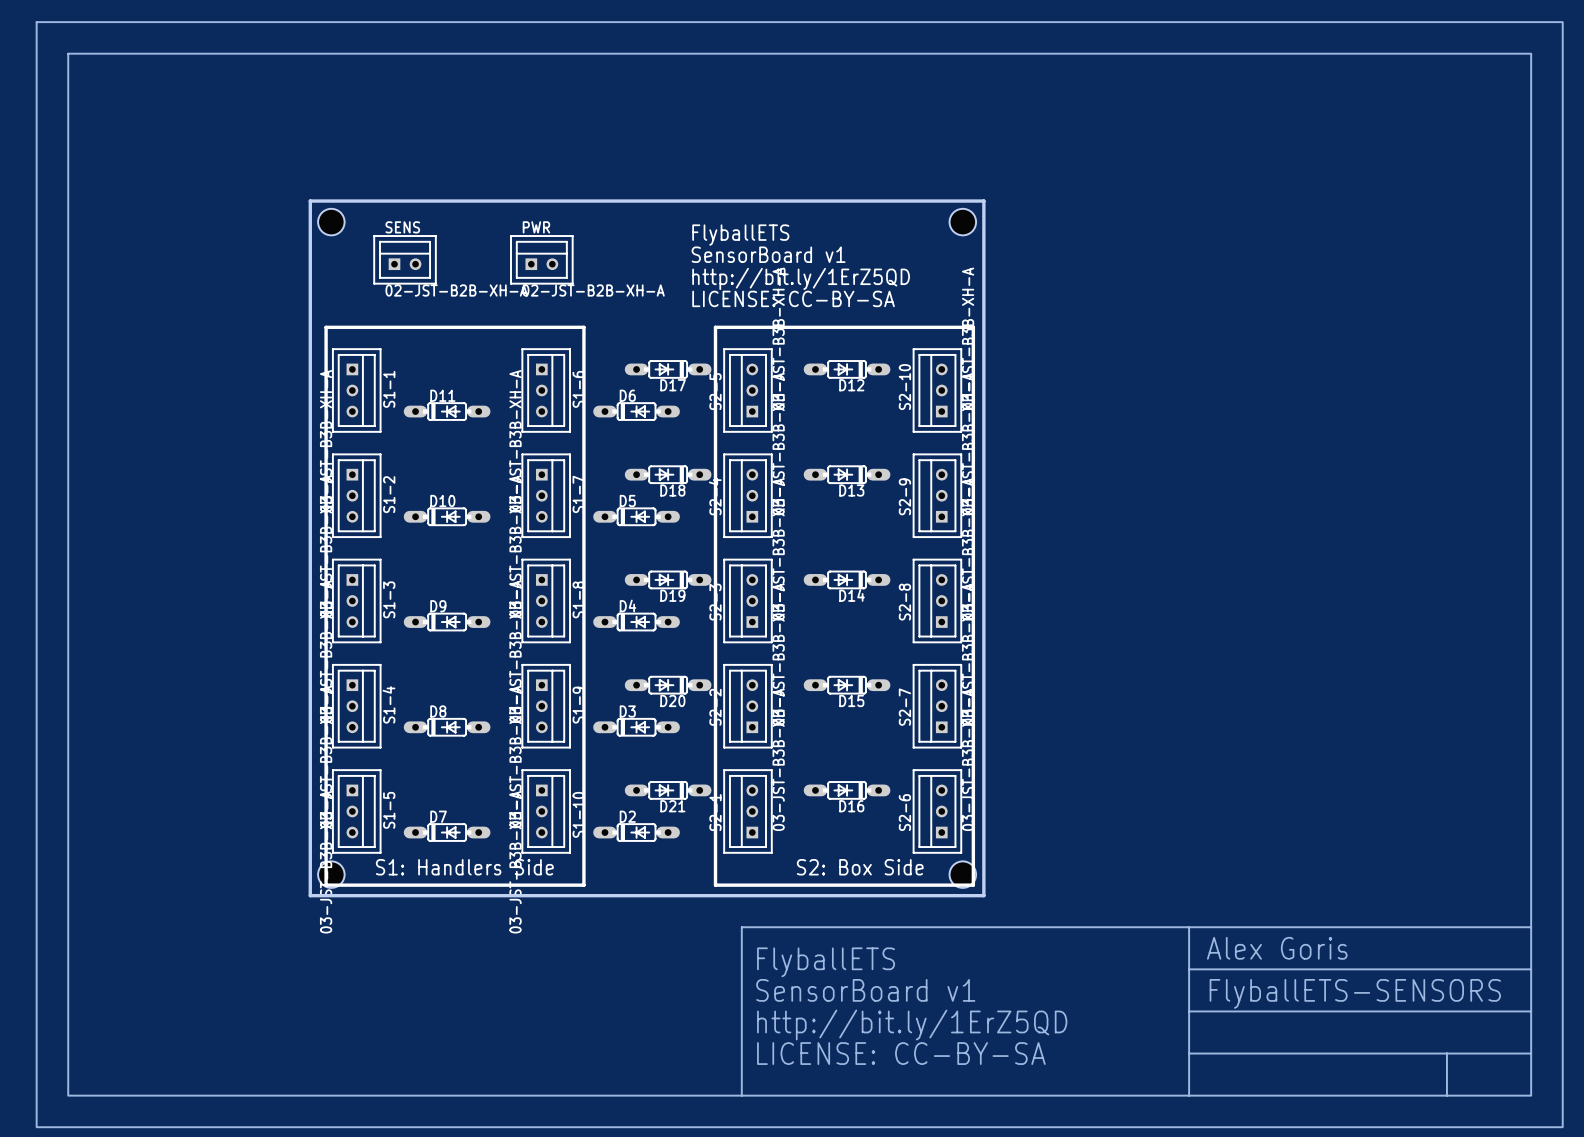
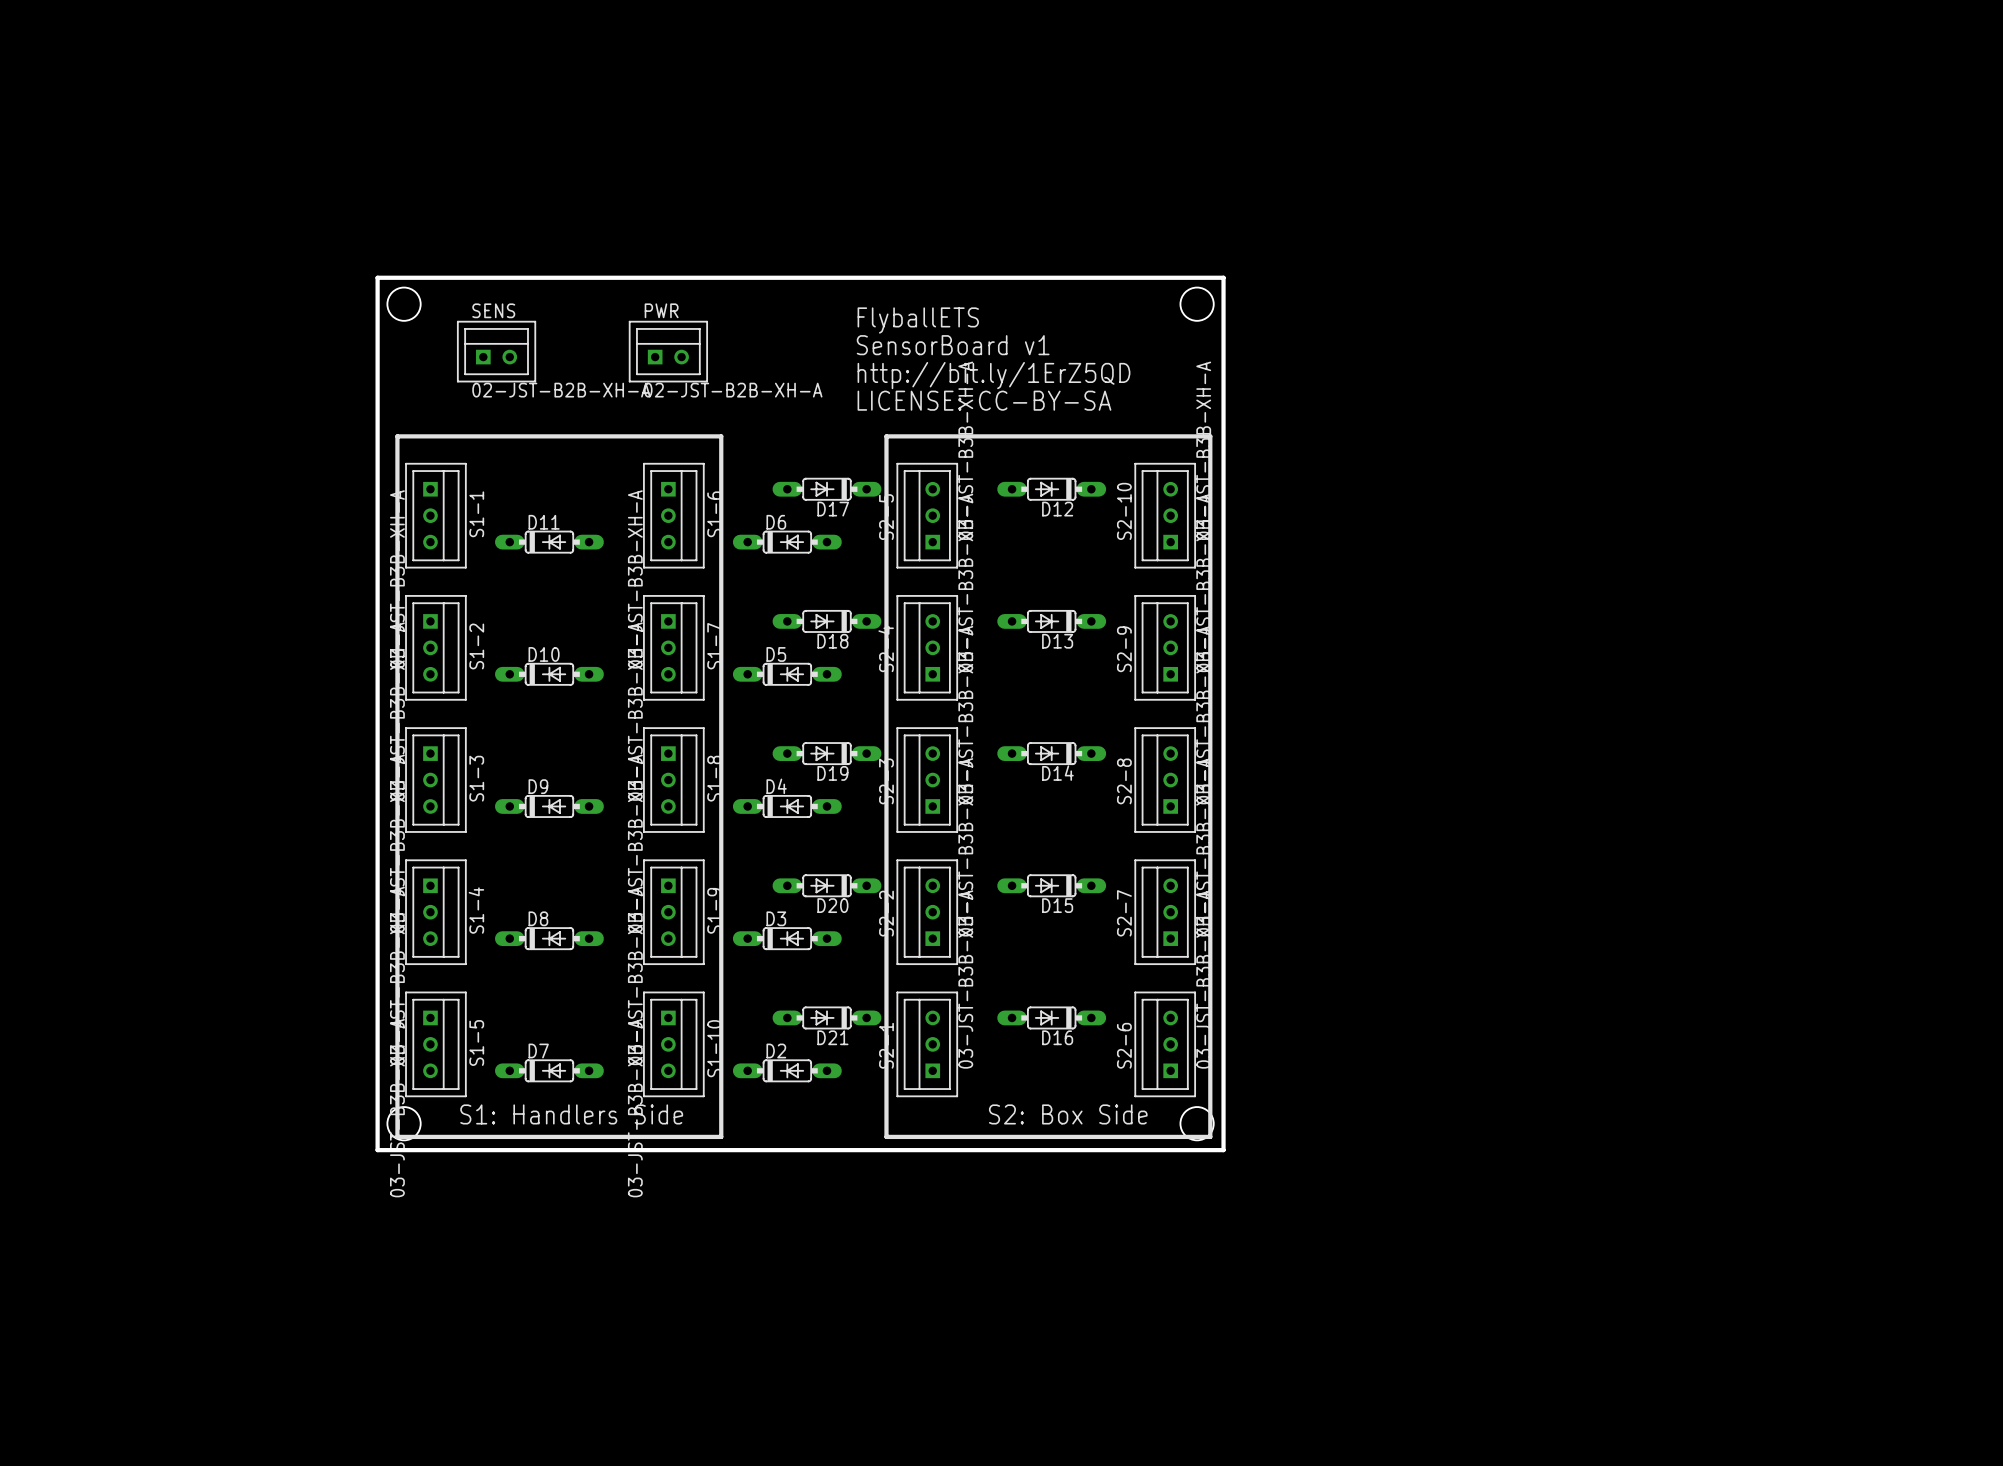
drawing: [36, 22, 1563, 1128] -> none
text: Alex Goris (1277, 948) -> none
text: FlyballETS (826, 962) -> none
text: SensorBoard v1 (865, 990) -> none
text: http://bit.ly/1ErZ5QD (912, 1024) -> none
text: LICENSE: CC-BY-SA (901, 1053) -> none

